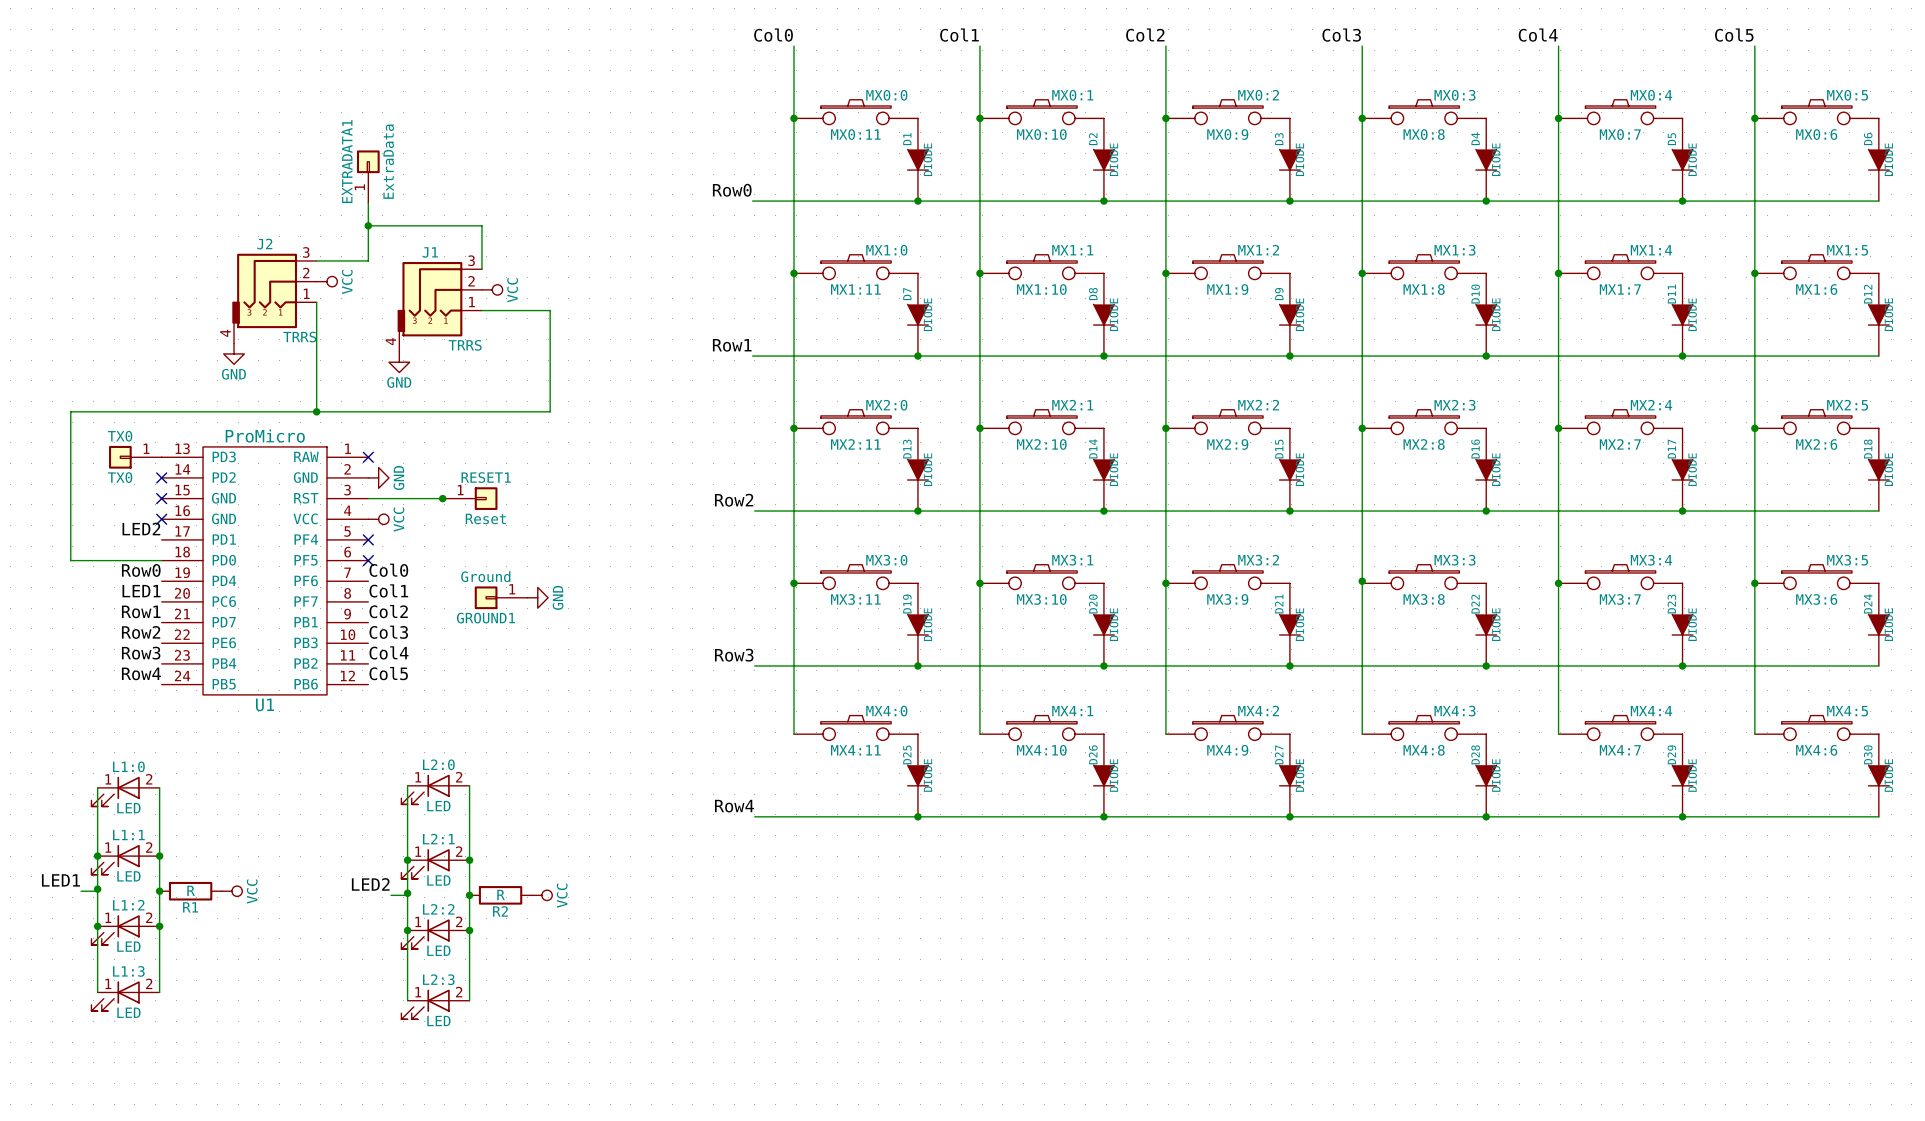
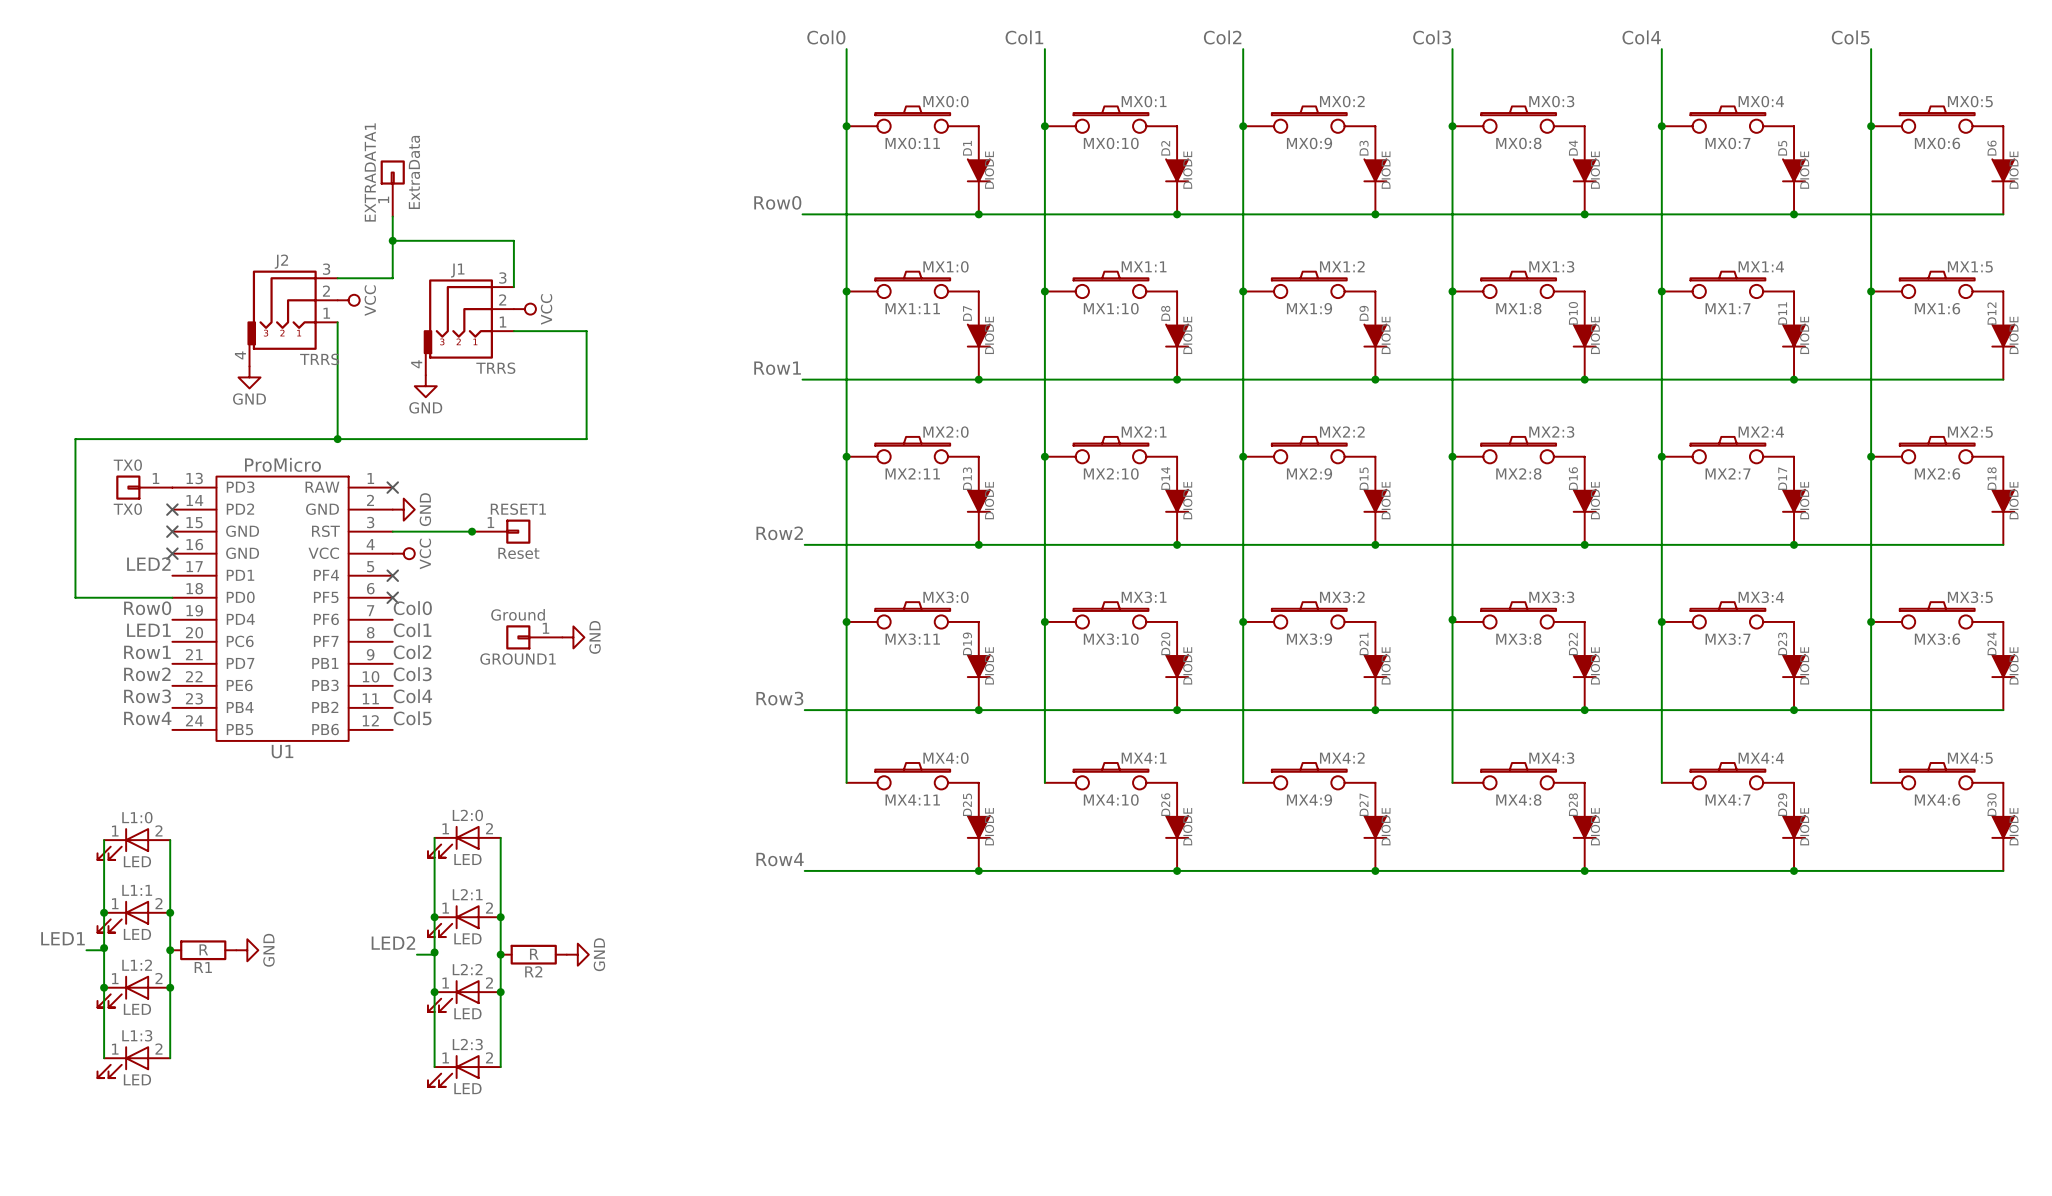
power symbol: VCC (231, 891) -> GND (247, 950)
power symbol: VCC (541, 895) -> GND (577, 954)

